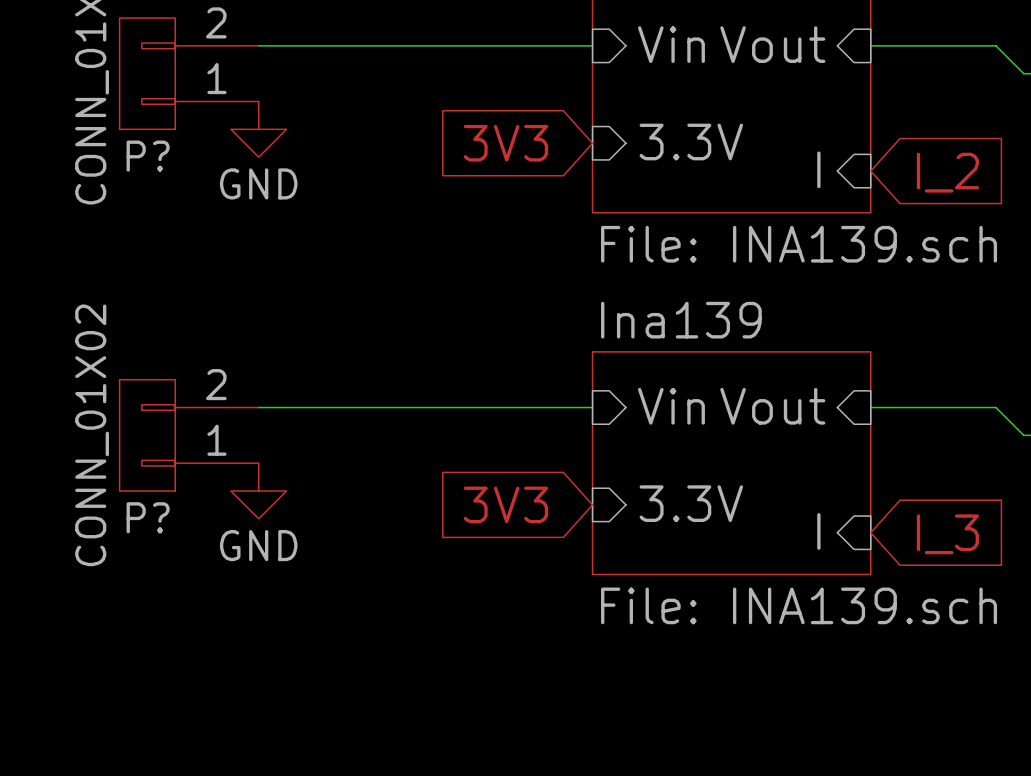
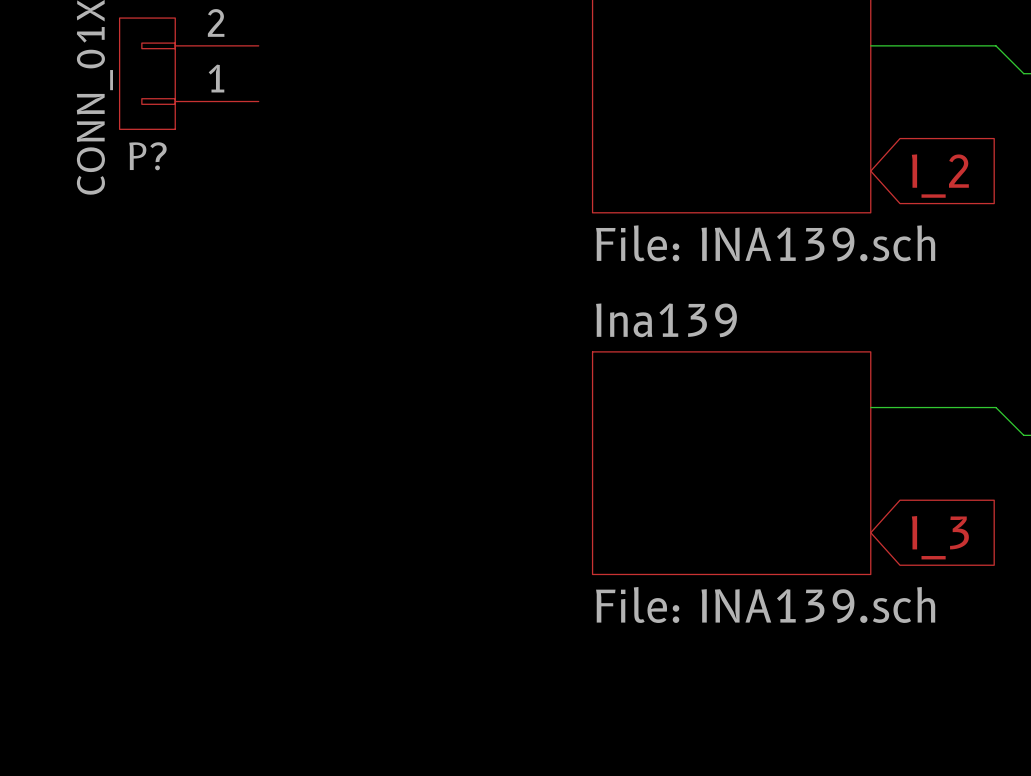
sheet pin: Vin (671, 44) -> none
sheet pin: Vout (772, 44) -> none
wire: (258, 45) (592, 45) -> none
power symbol: GND (258, 129) -> none
sheet pin: 3.3V (691, 142) -> none
global label: 3V3 (505, 143) -> none
sheet pin: I (818, 169) -> none
sheet pin: Vin (671, 406) -> none
sheet pin: Vout (772, 406) -> none
wire: (258, 407) (592, 407) -> none
P?: CONN_01X02 (189, 435) -> none
power symbol: GND (258, 491) -> none
sheet pin: 3.3V (691, 503) -> none
global label: 3V3 (505, 504) -> none
sheet pin: I (818, 531) -> none

